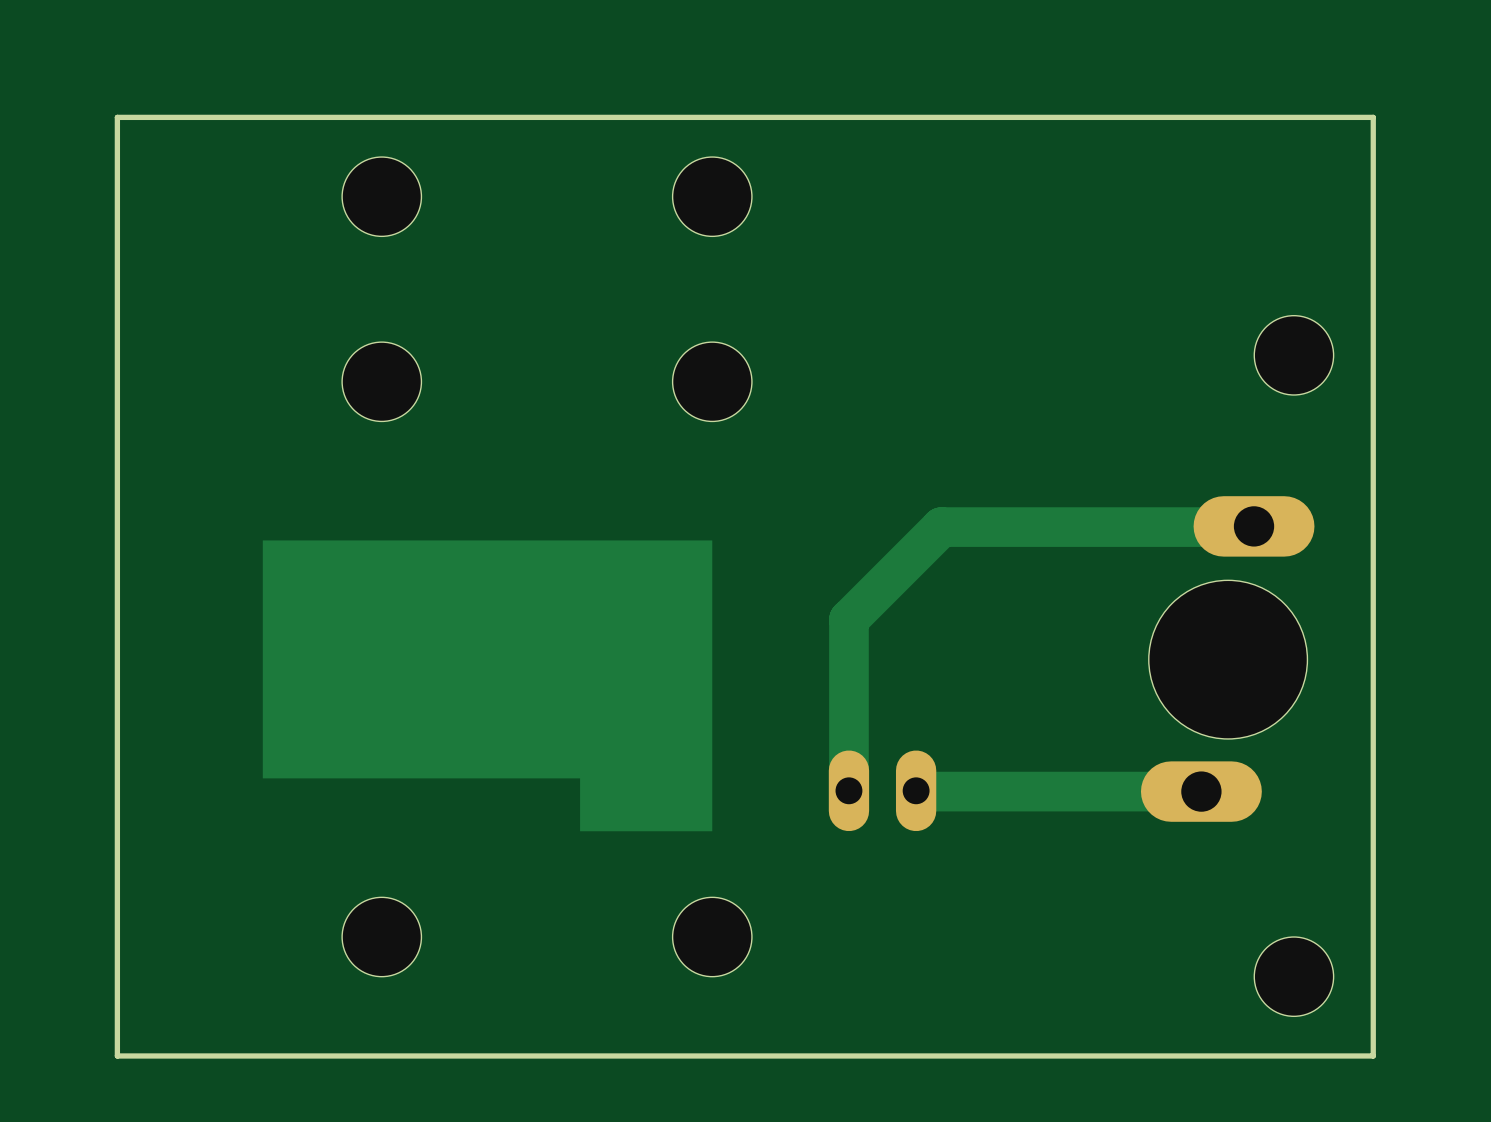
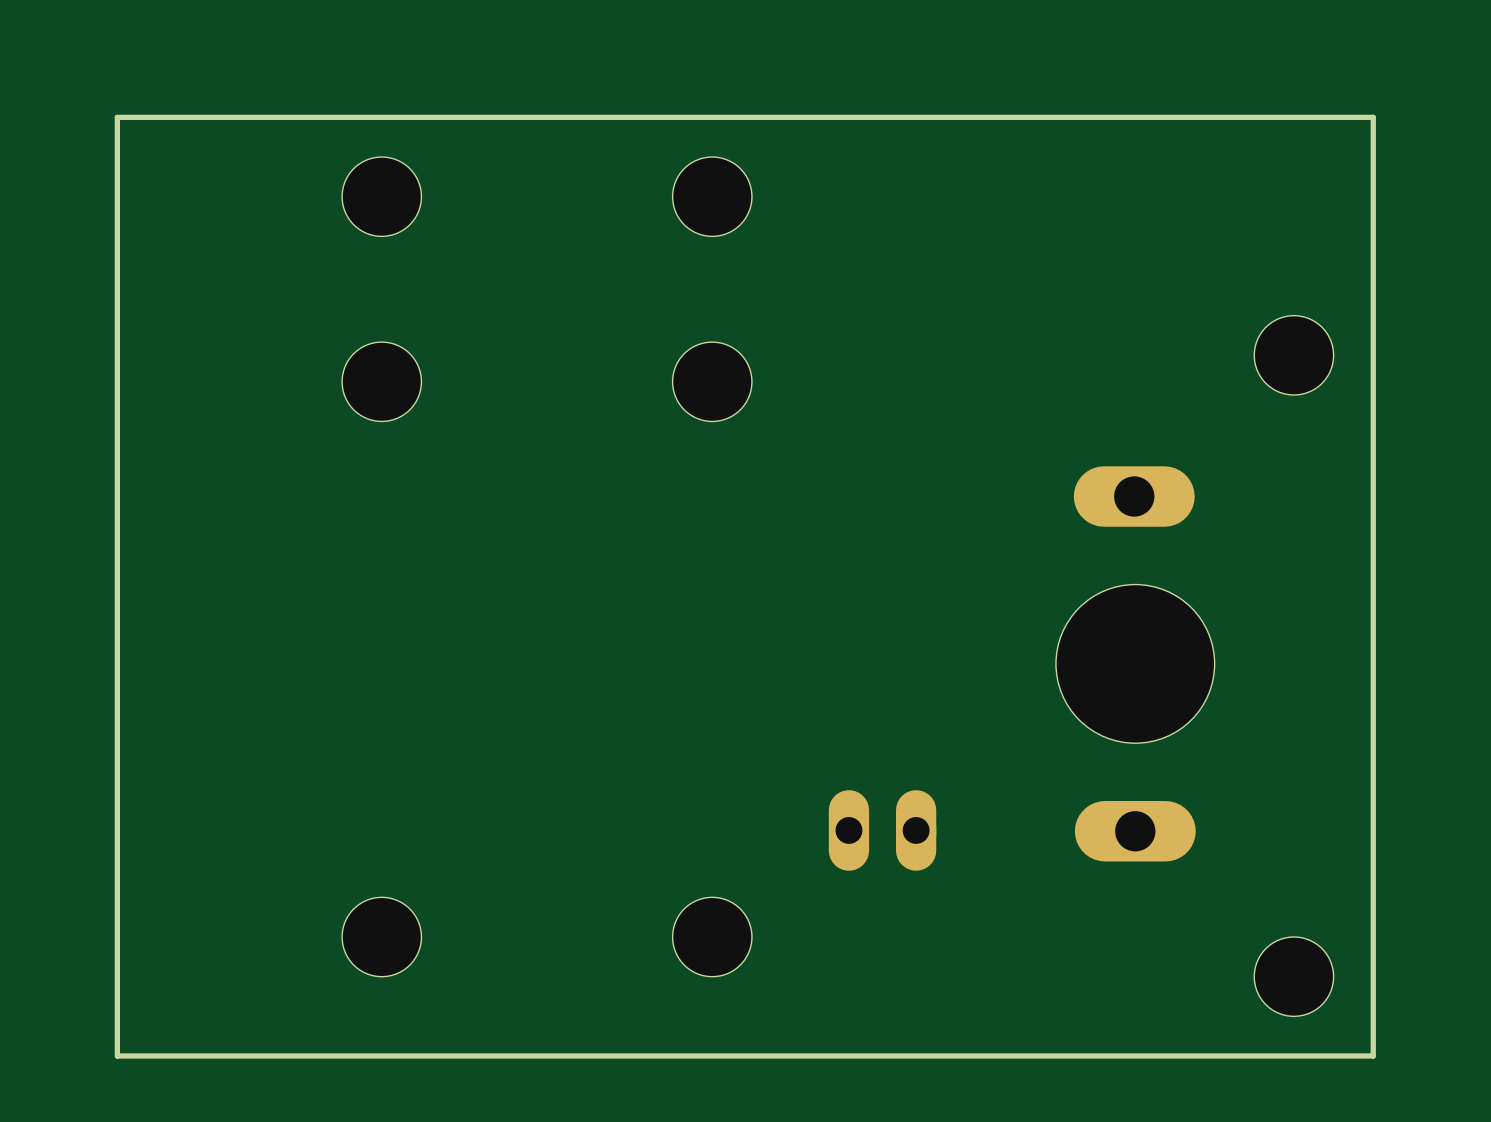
part position: (1254, 526) -> (1134, 496)
track: (1254, 527) (941, 527) (848, 619) (848, 790) -> none
drawing: [262, 540, 713, 832] -> none
hole position: (1228, 659) -> (1135, 663)
part position: (882, 790) -> (882, 830)
part position: (1201, 791) -> (1135, 831)
track: (1202, 791) (916, 791) -> none

